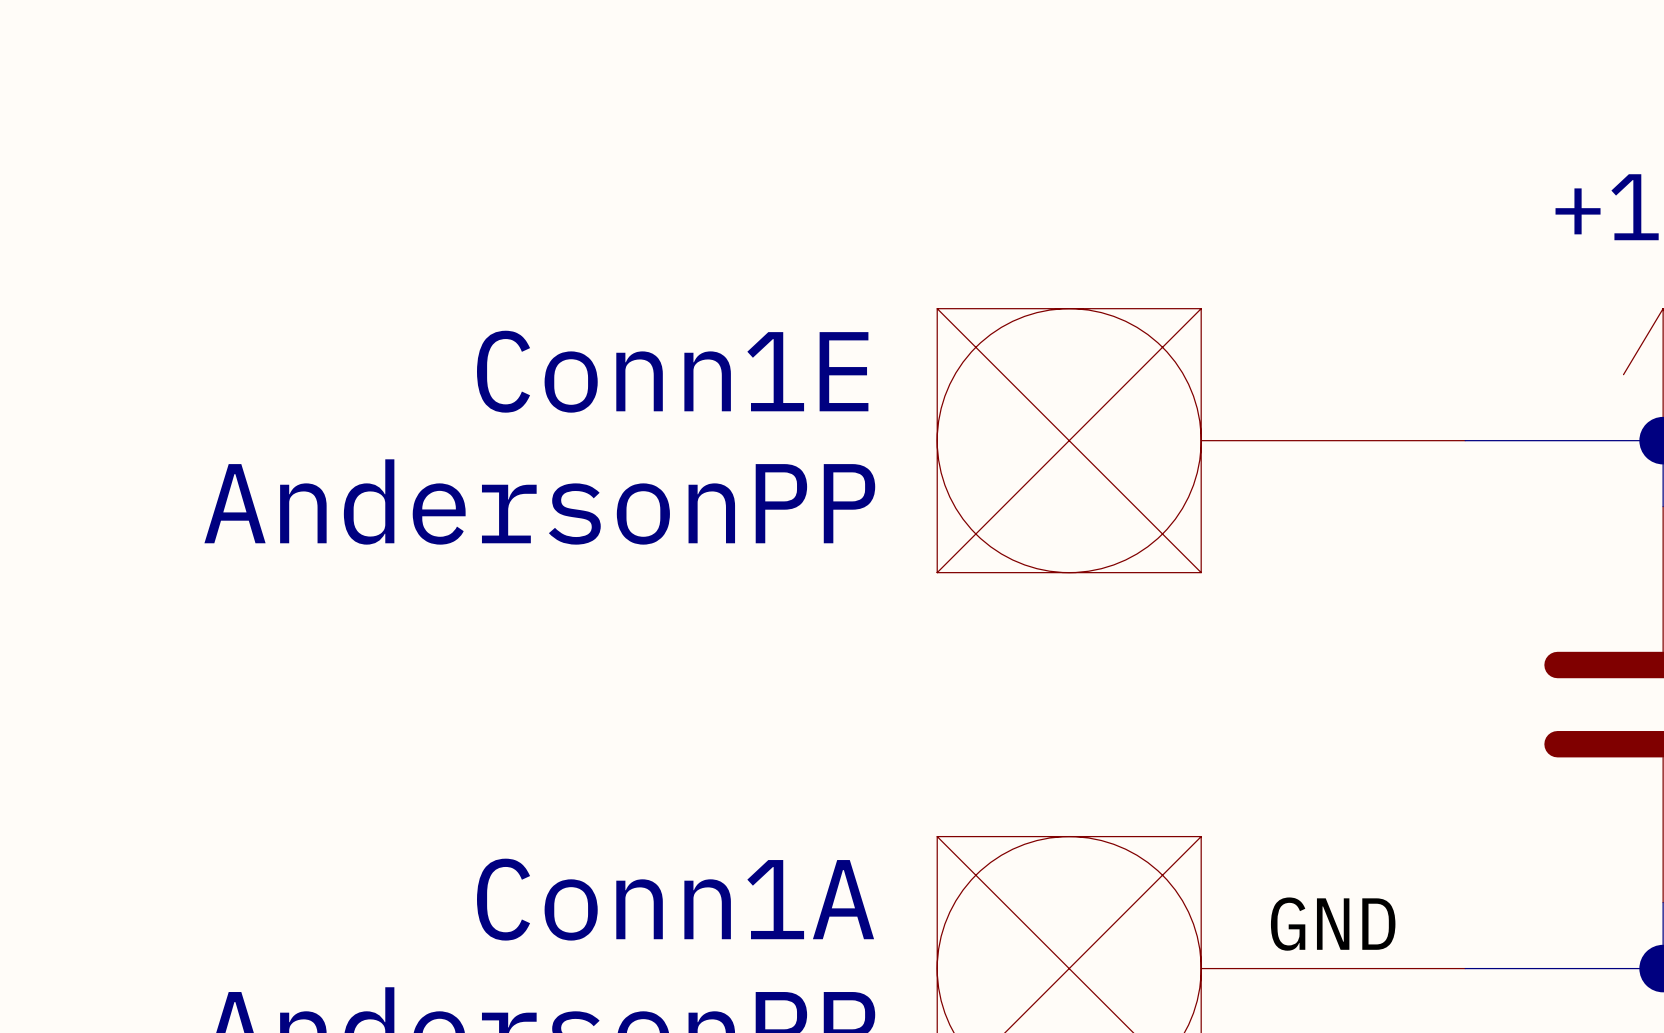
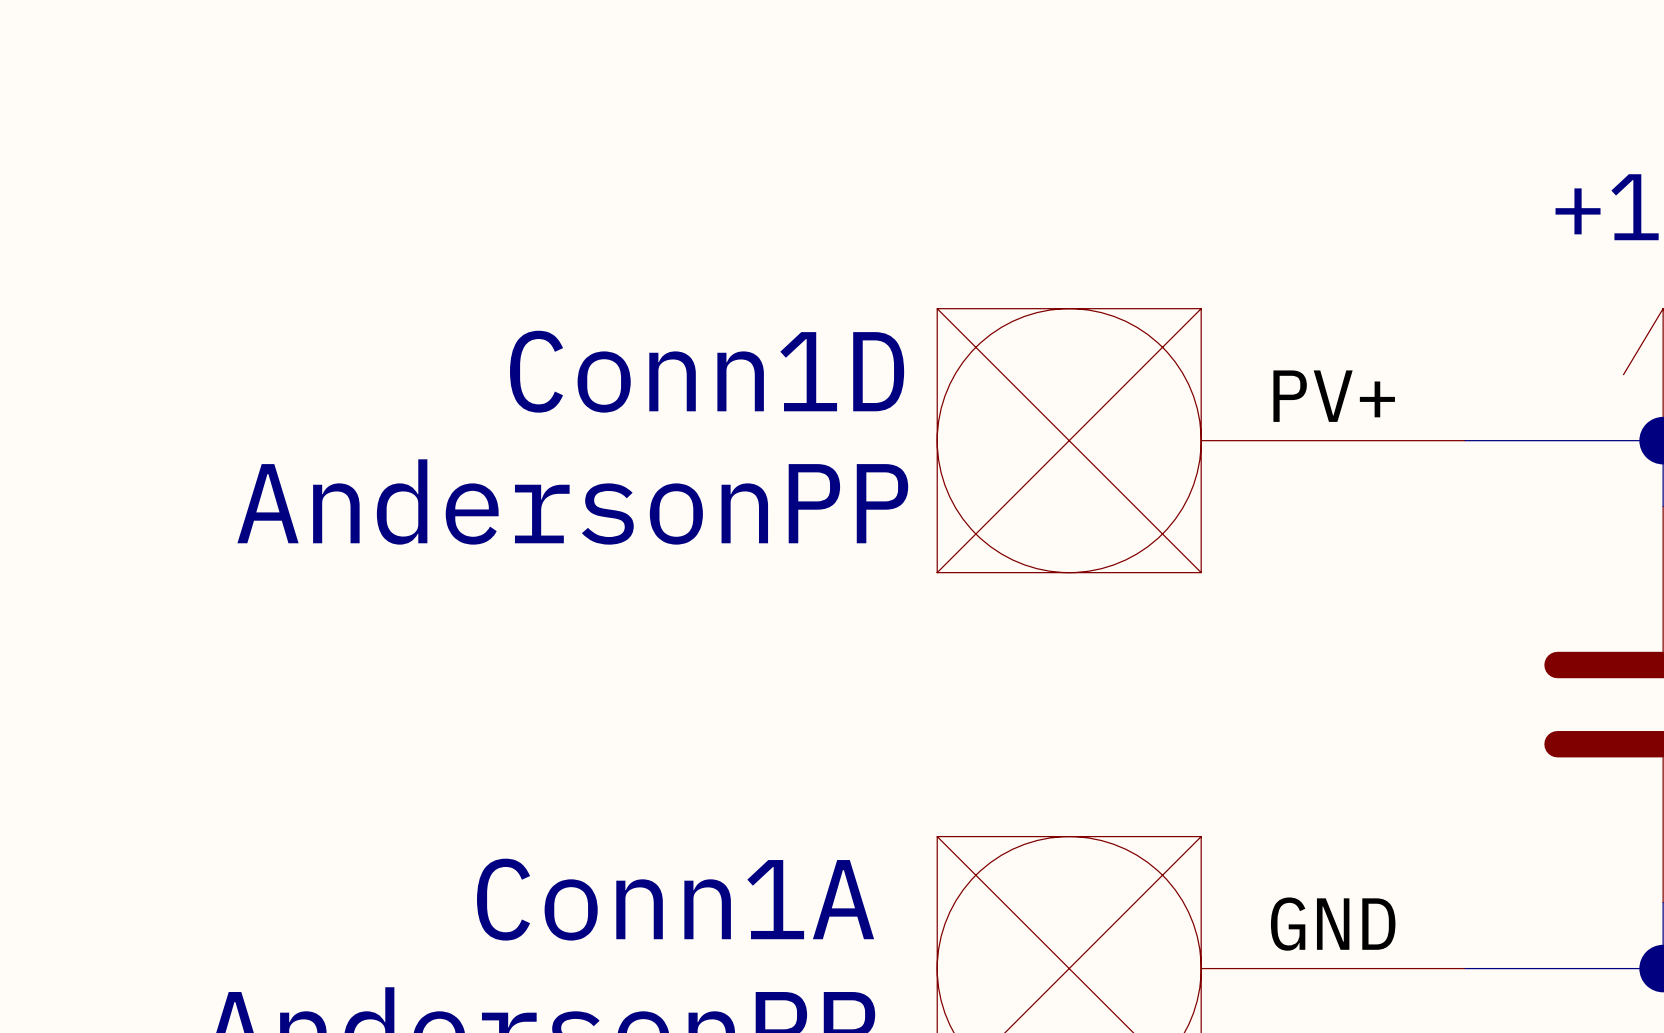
Conn1E name: Conn1E (672, 371) -> Conn1D (707, 371)
Conn1E pin name: none -> PV+ (1334, 396)
Conn1E value position: AndersonPP (539, 501) -> AndersonPP (572, 501)

